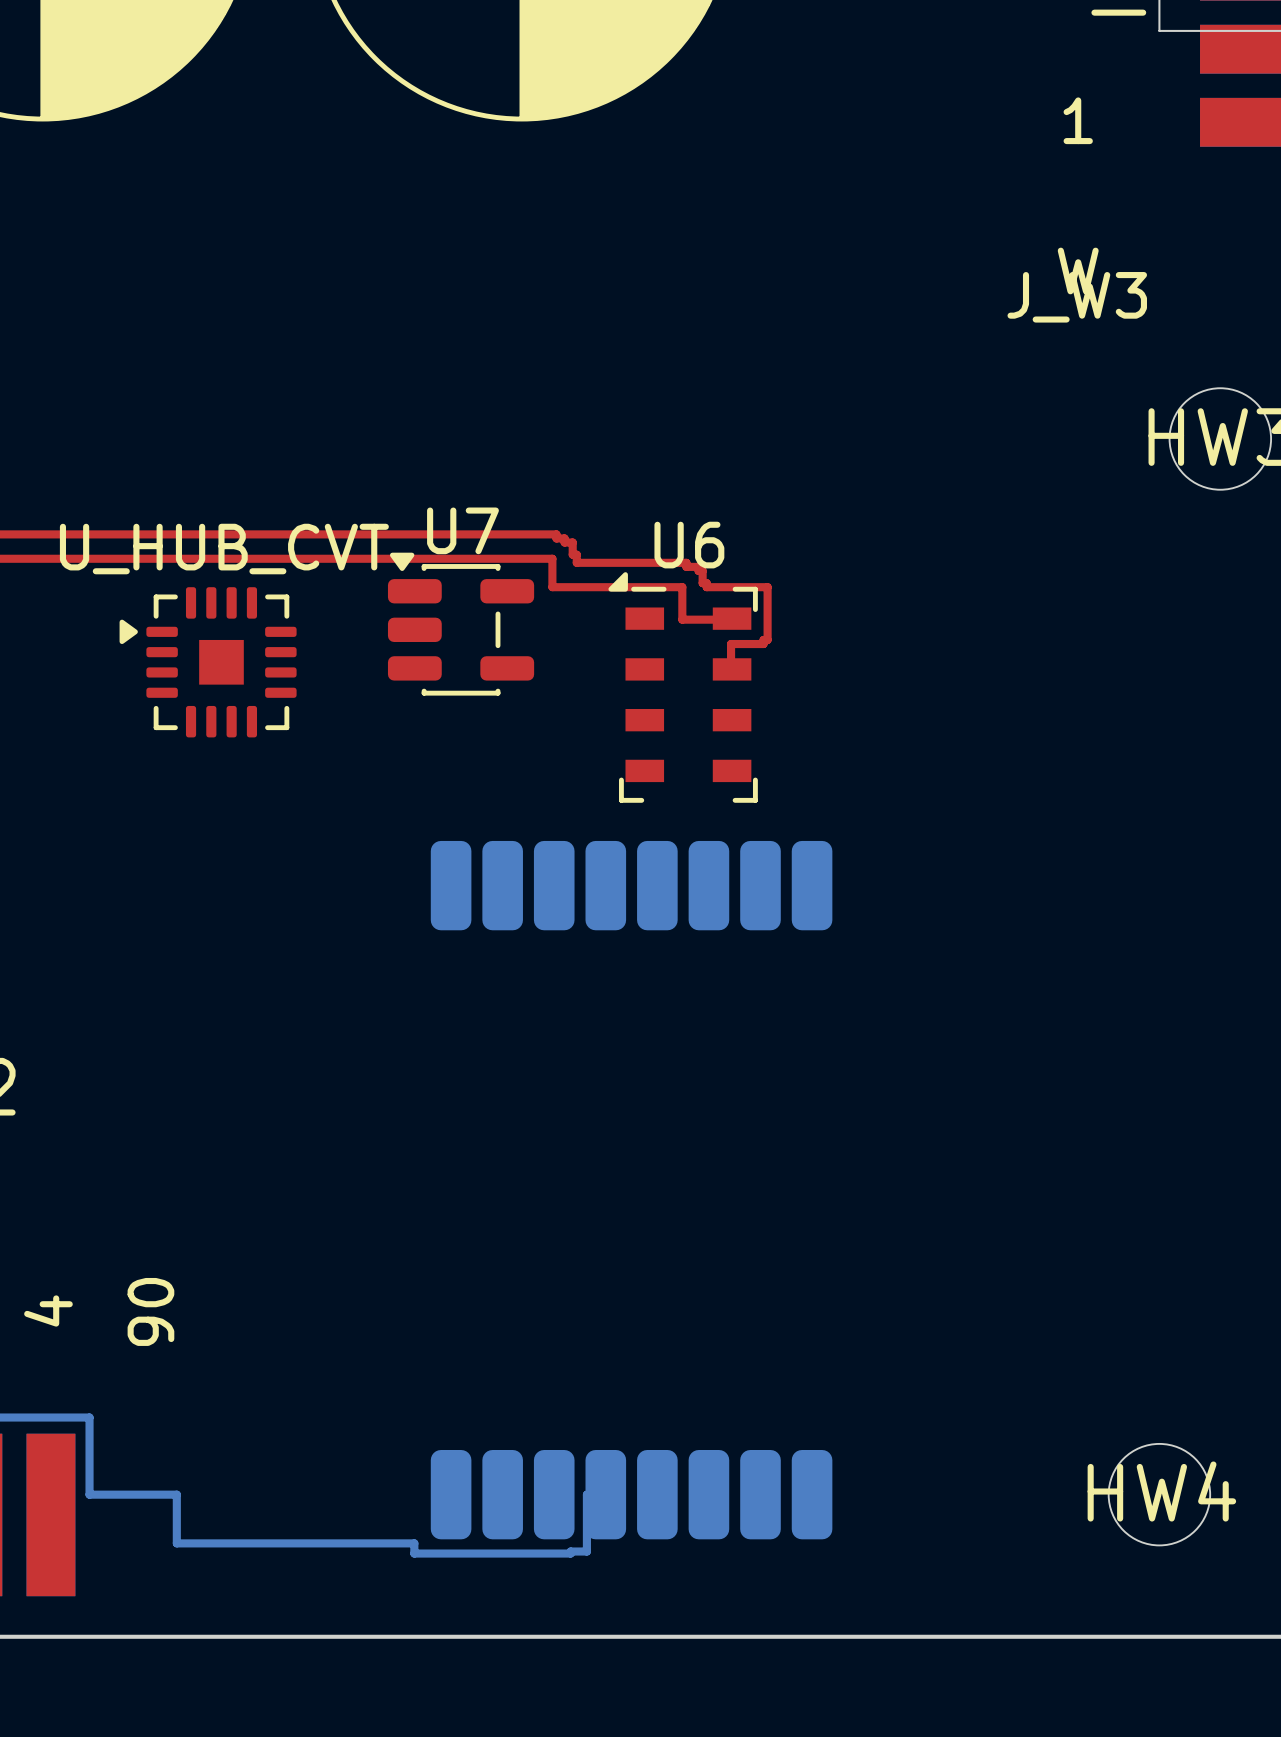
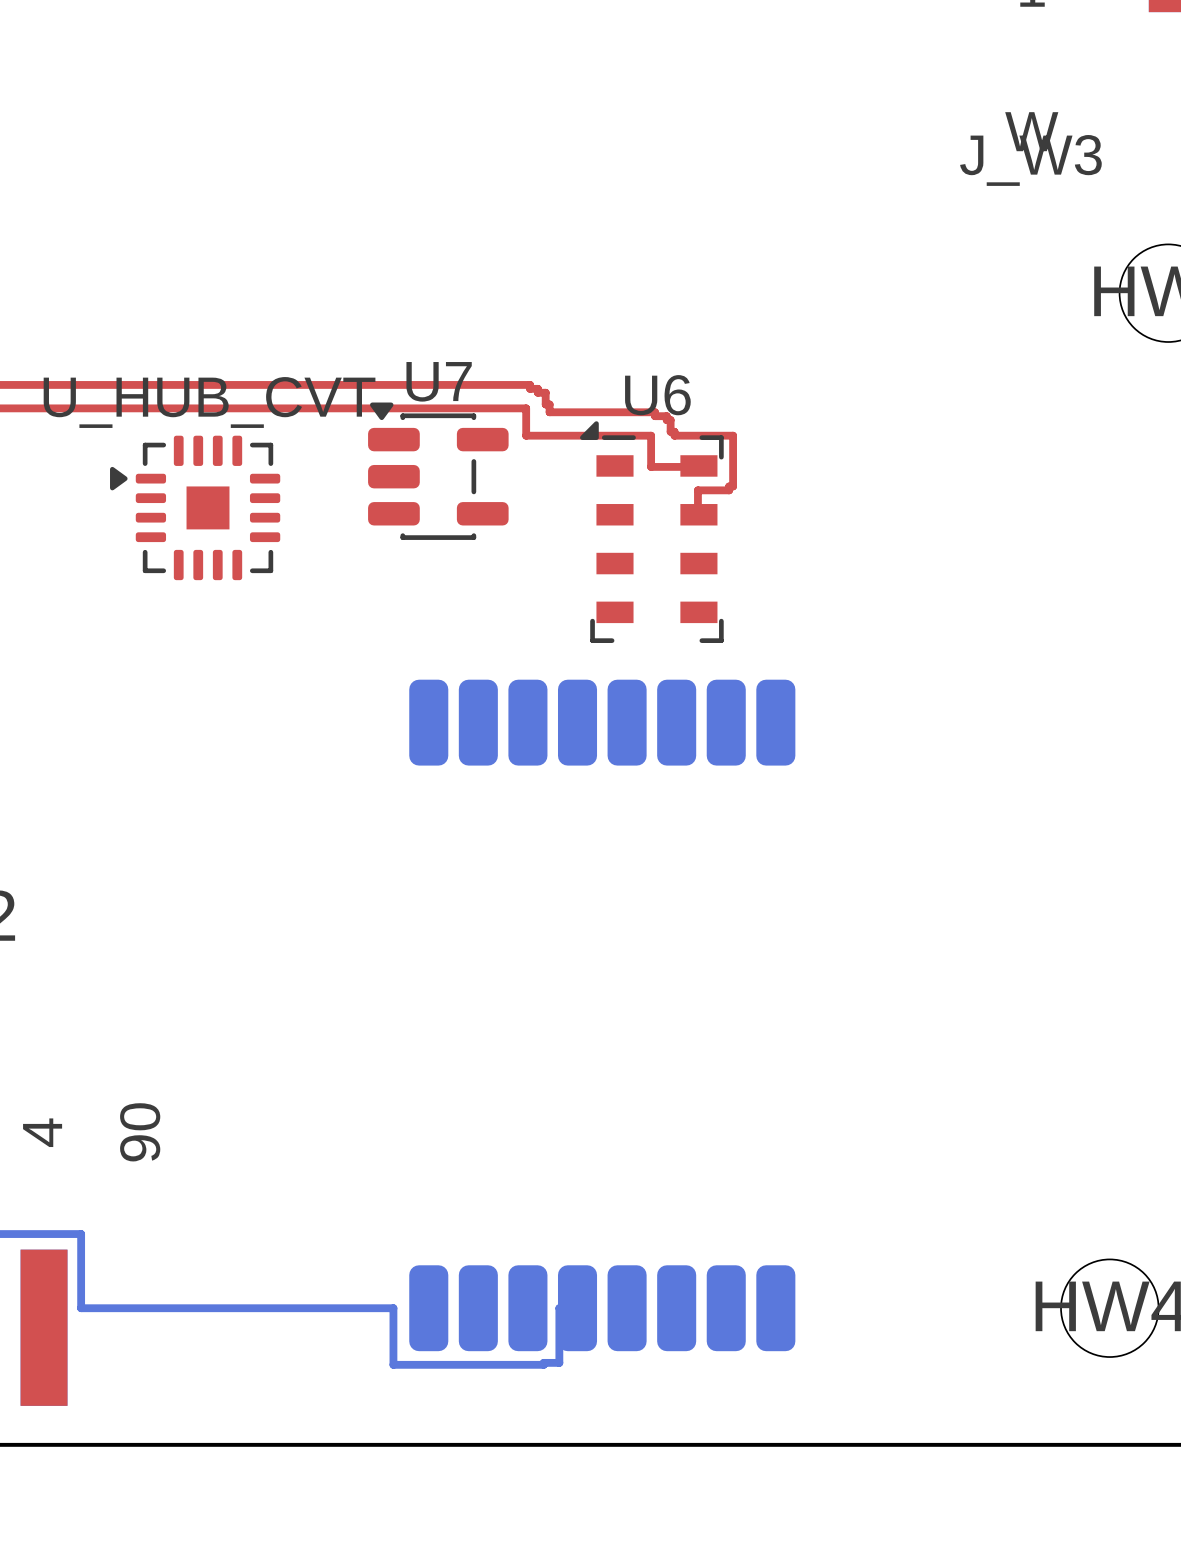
bottom track: (176, 1494) (176, 1543) (414, 1543) -> (165, 1308) (393, 1308) (393, 1355)

